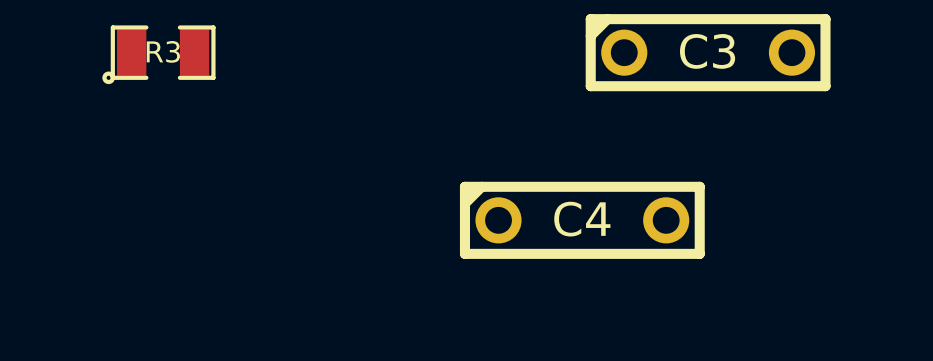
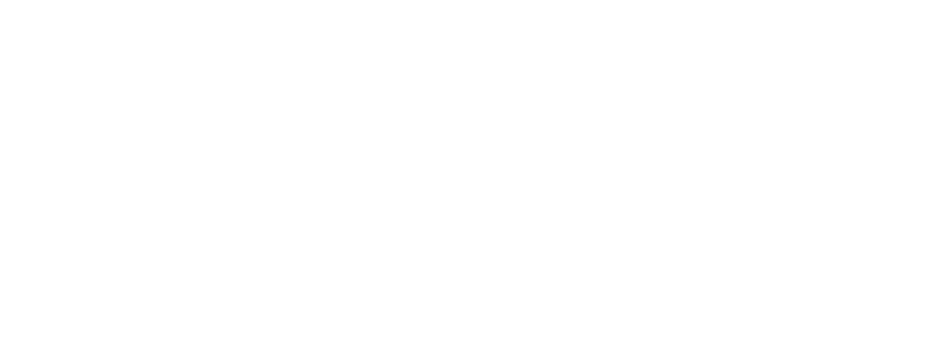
C3: (708, 52) -> none
R3: (158, 54) -> none
C4: (582, 220) -> none

